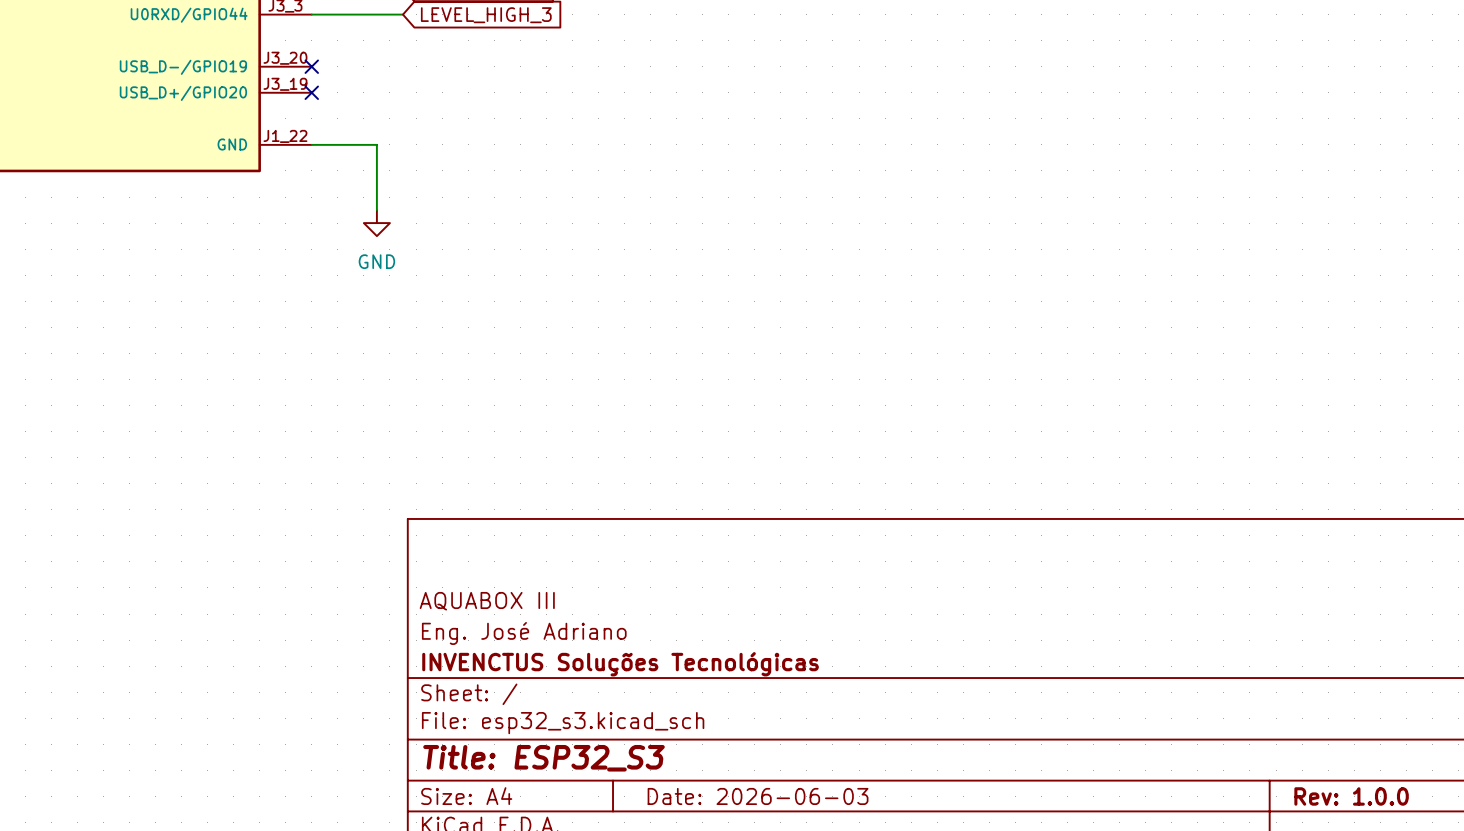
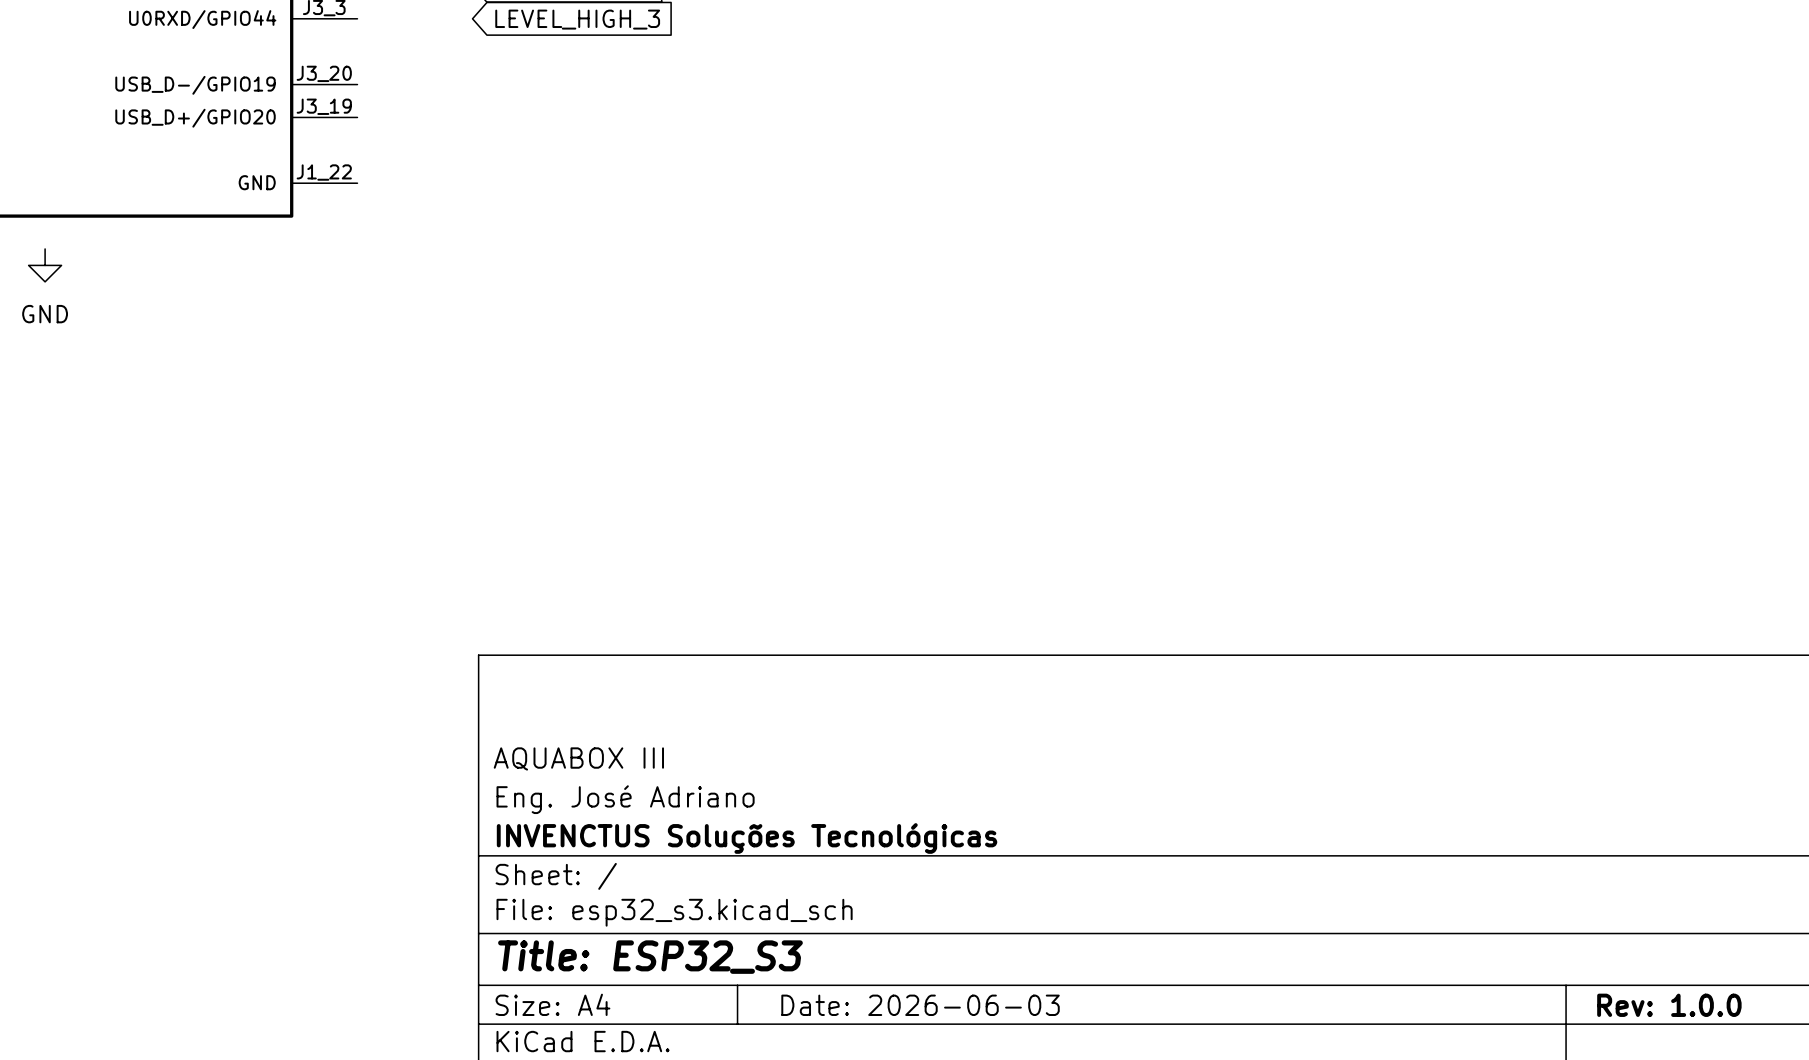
wire: (311, 14) (402, 14) -> none
no-connect mark: (311, 66) -> none
no-connect mark: (311, 92) -> none
wire: (311, 144) (376, 144) (376, 210) -> none
power symbol: none -> GND (45, 265)
power symbol: GND (376, 223) -> none

